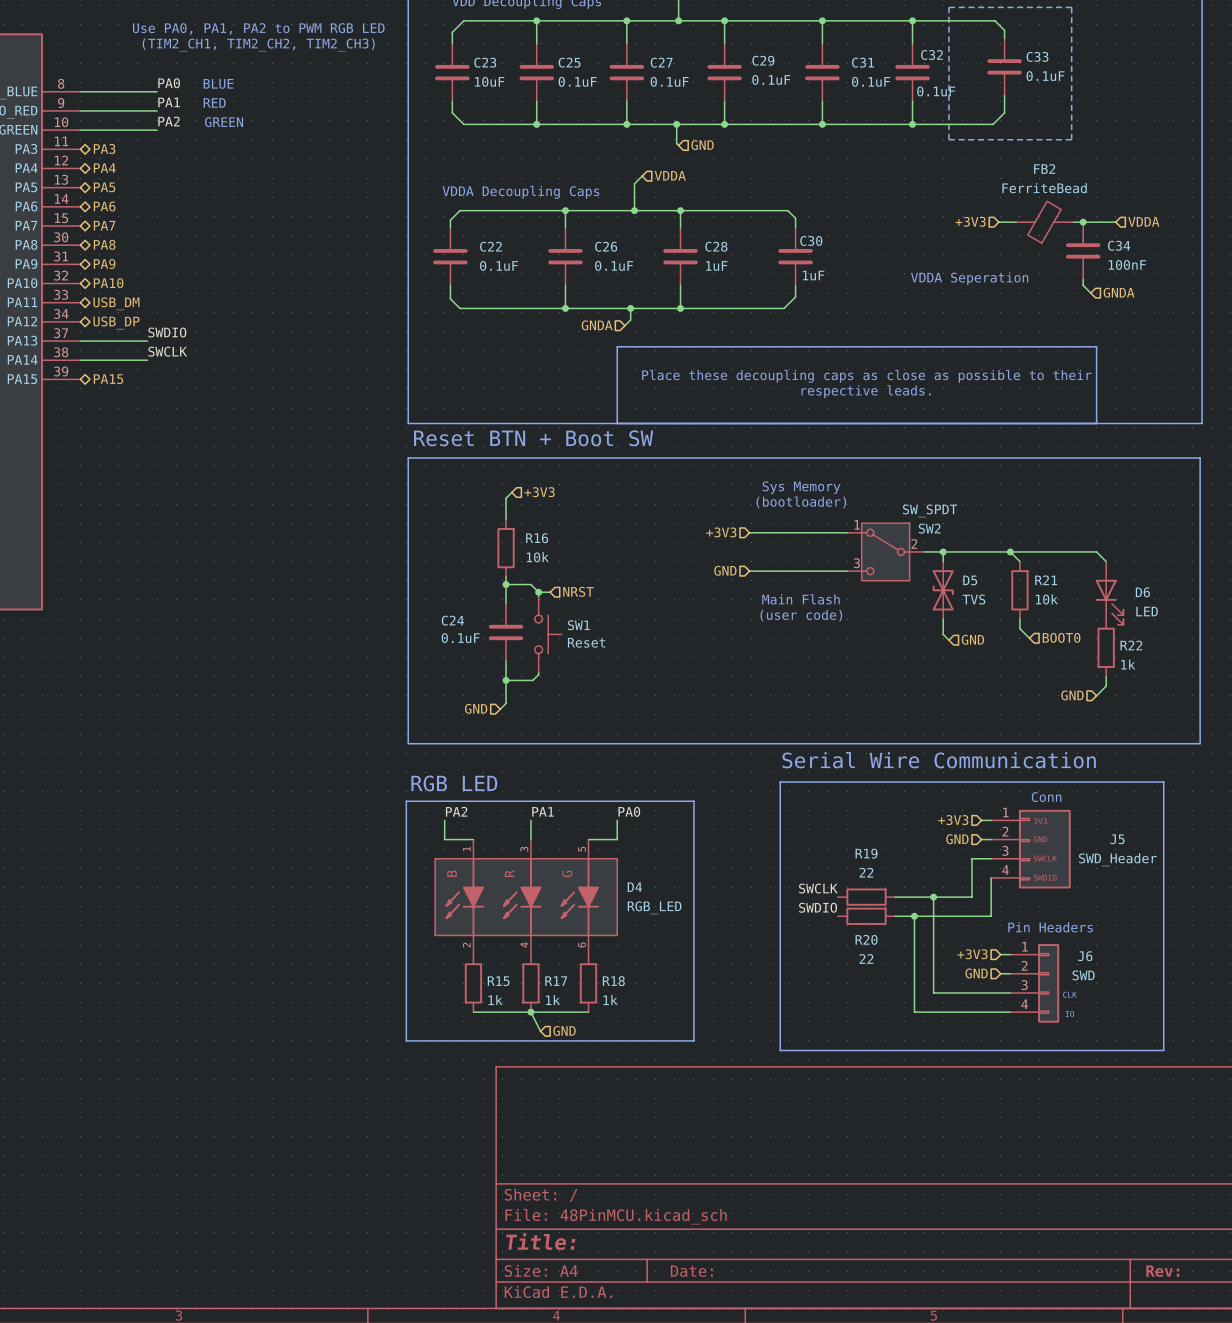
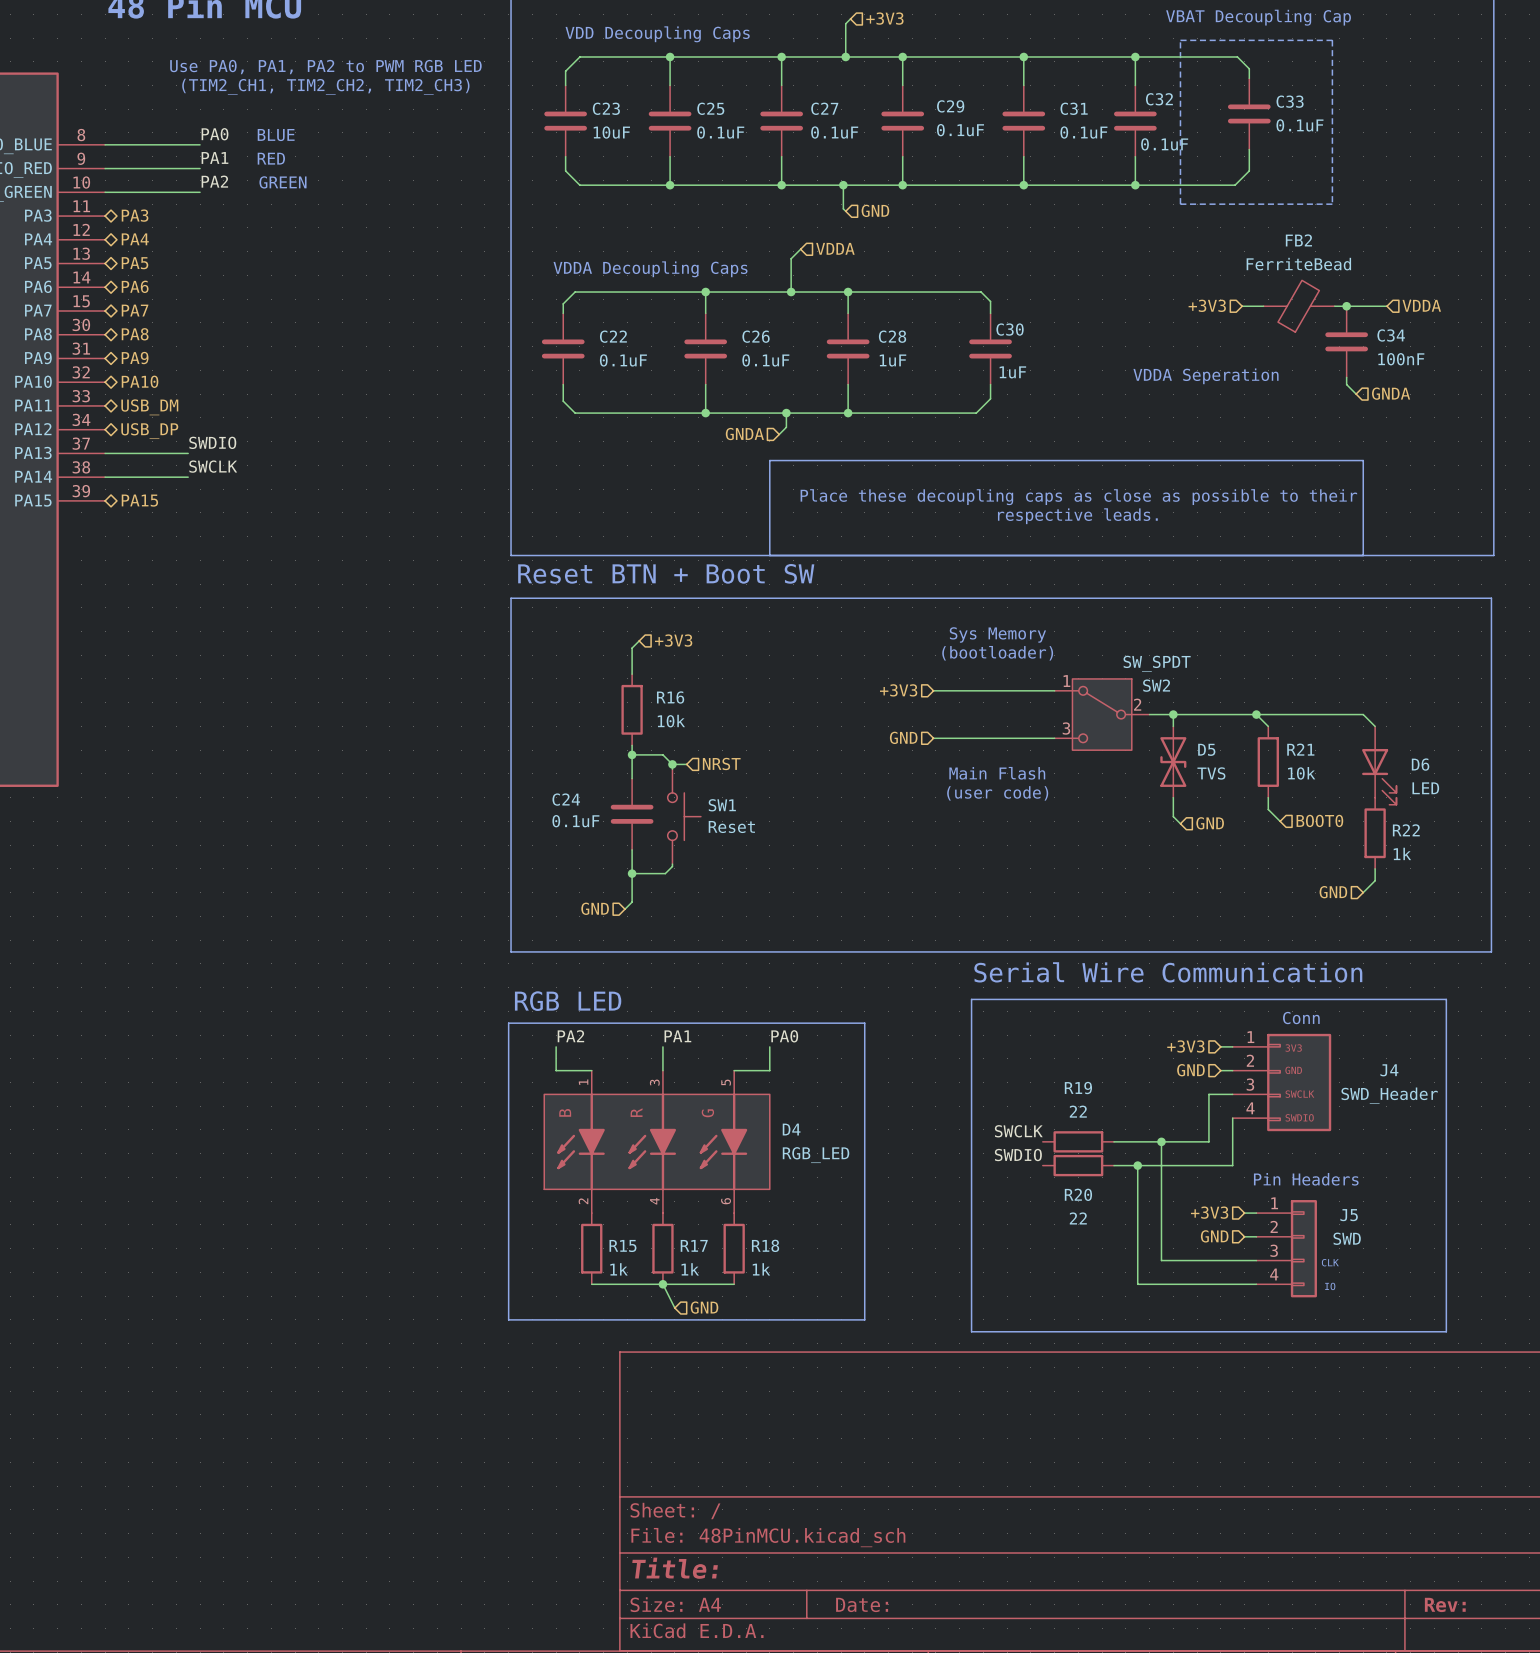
J5 name: J5 (1117, 839) -> J4 (1389, 1070)
J6 name: J6 (1085, 956) -> J5 (1349, 1215)

